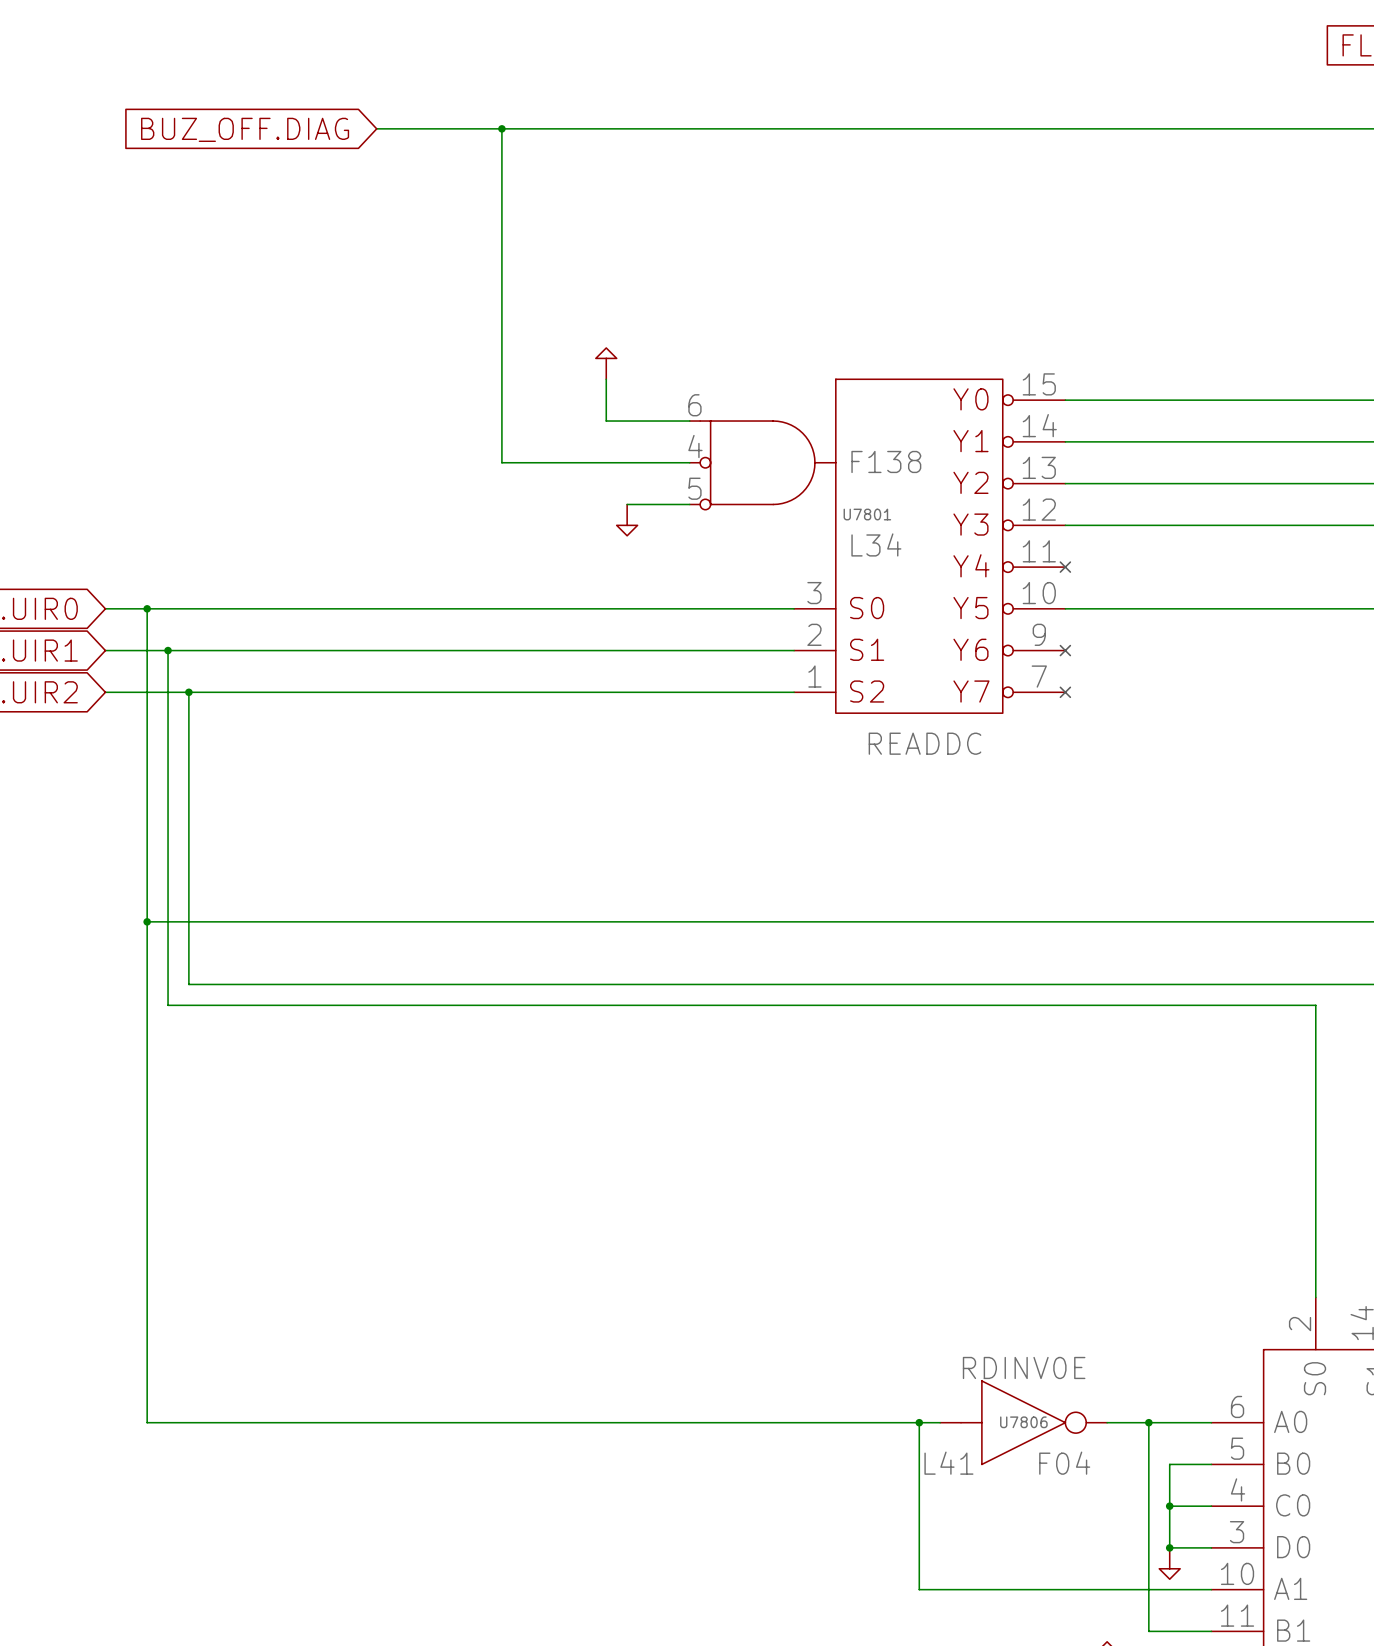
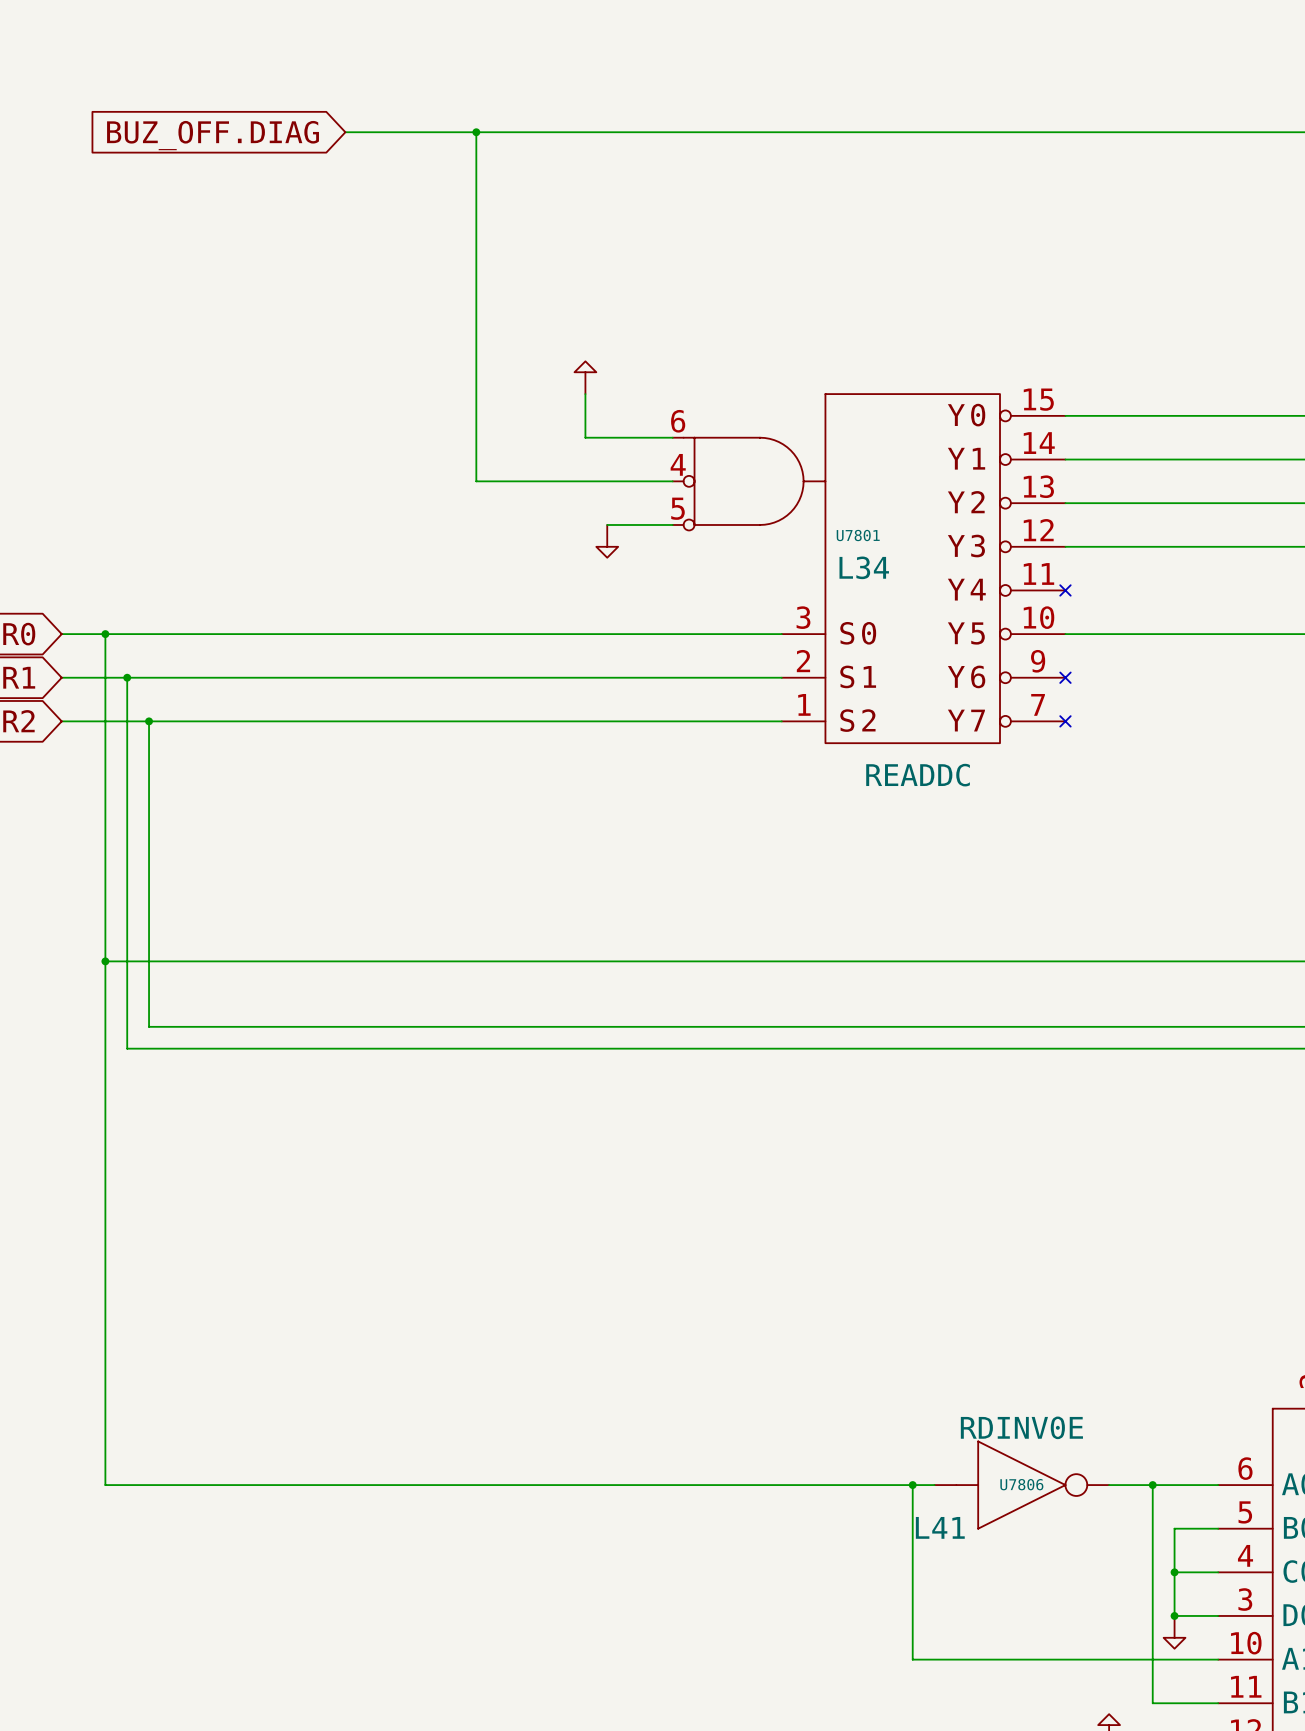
U7801 value: F138 (886, 461) -> none
U7806 value: F04 (1064, 1463) -> none

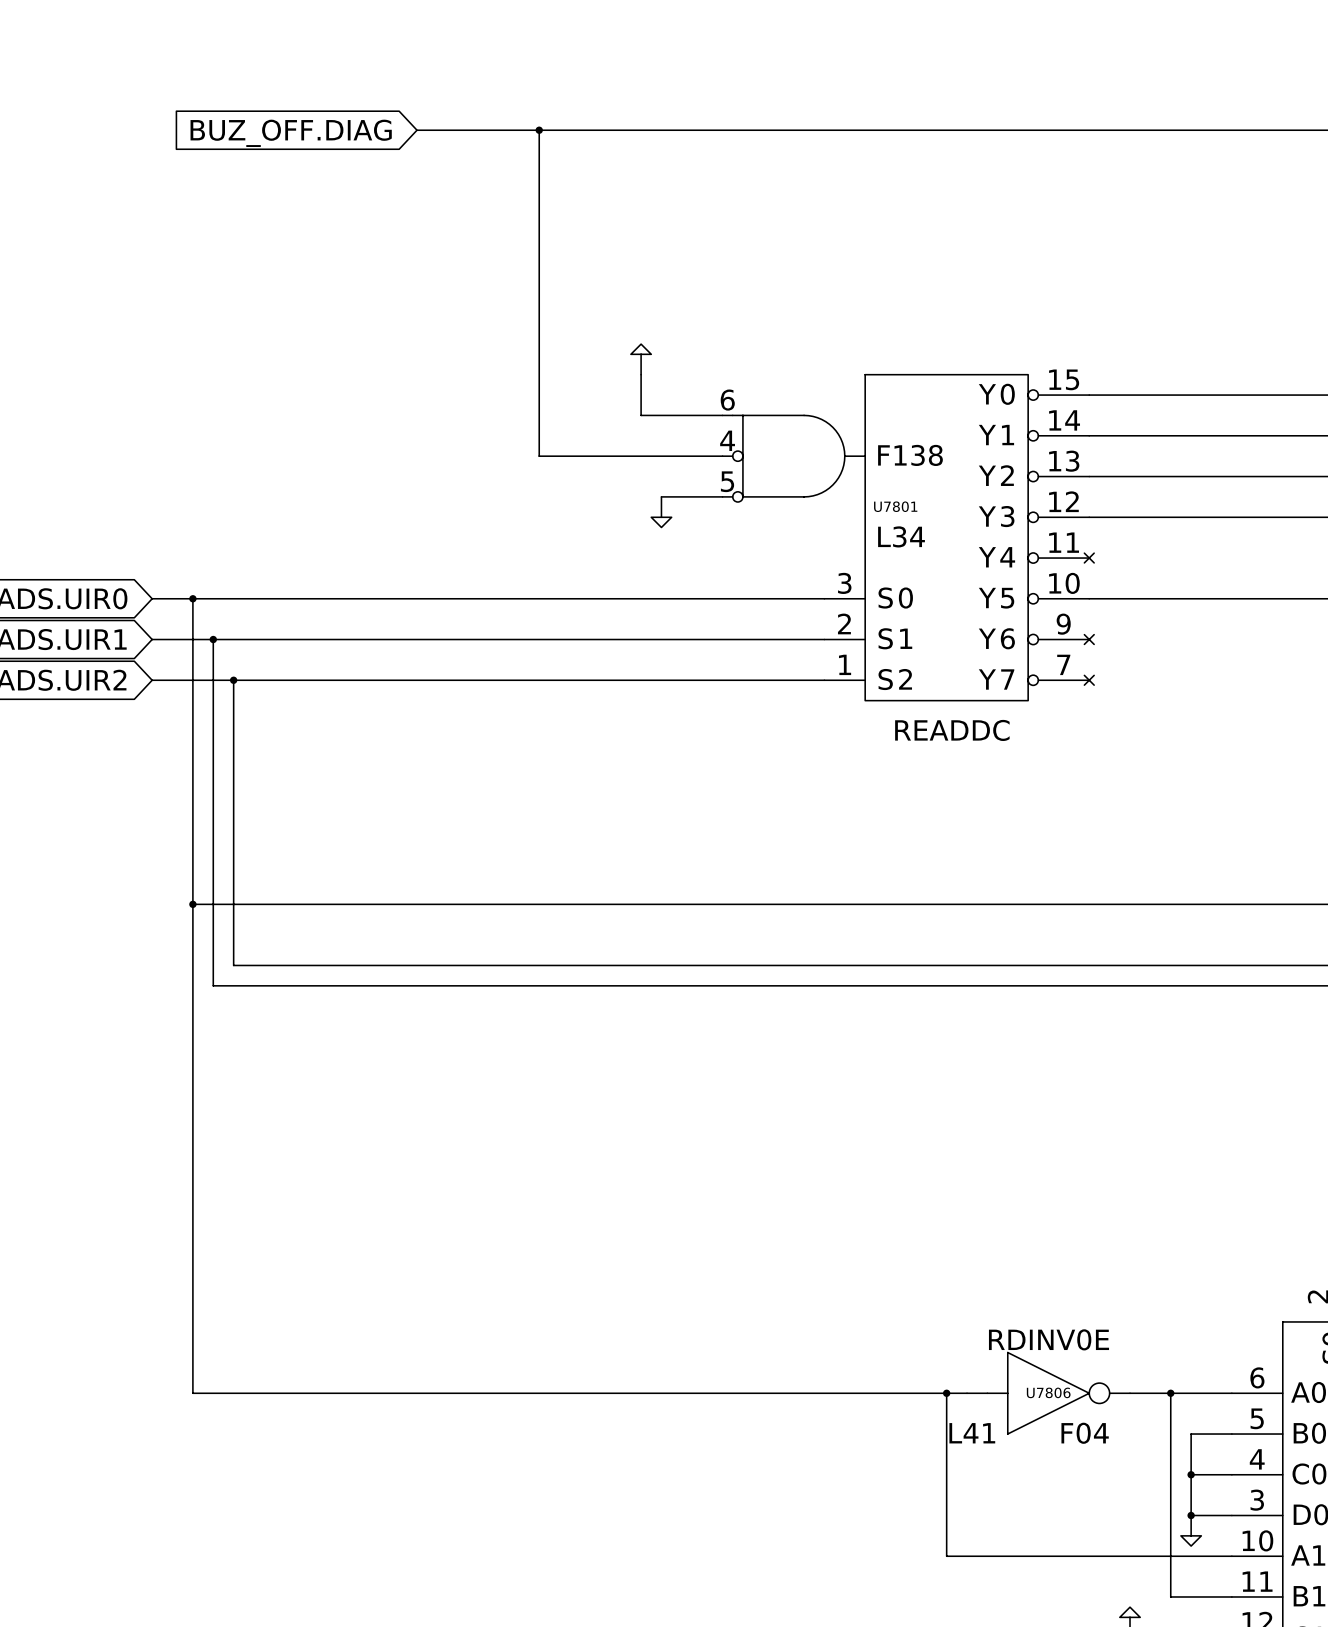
U7801 value: none -> F138 (910, 455)
U7806 value: none -> F04 (1085, 1433)

